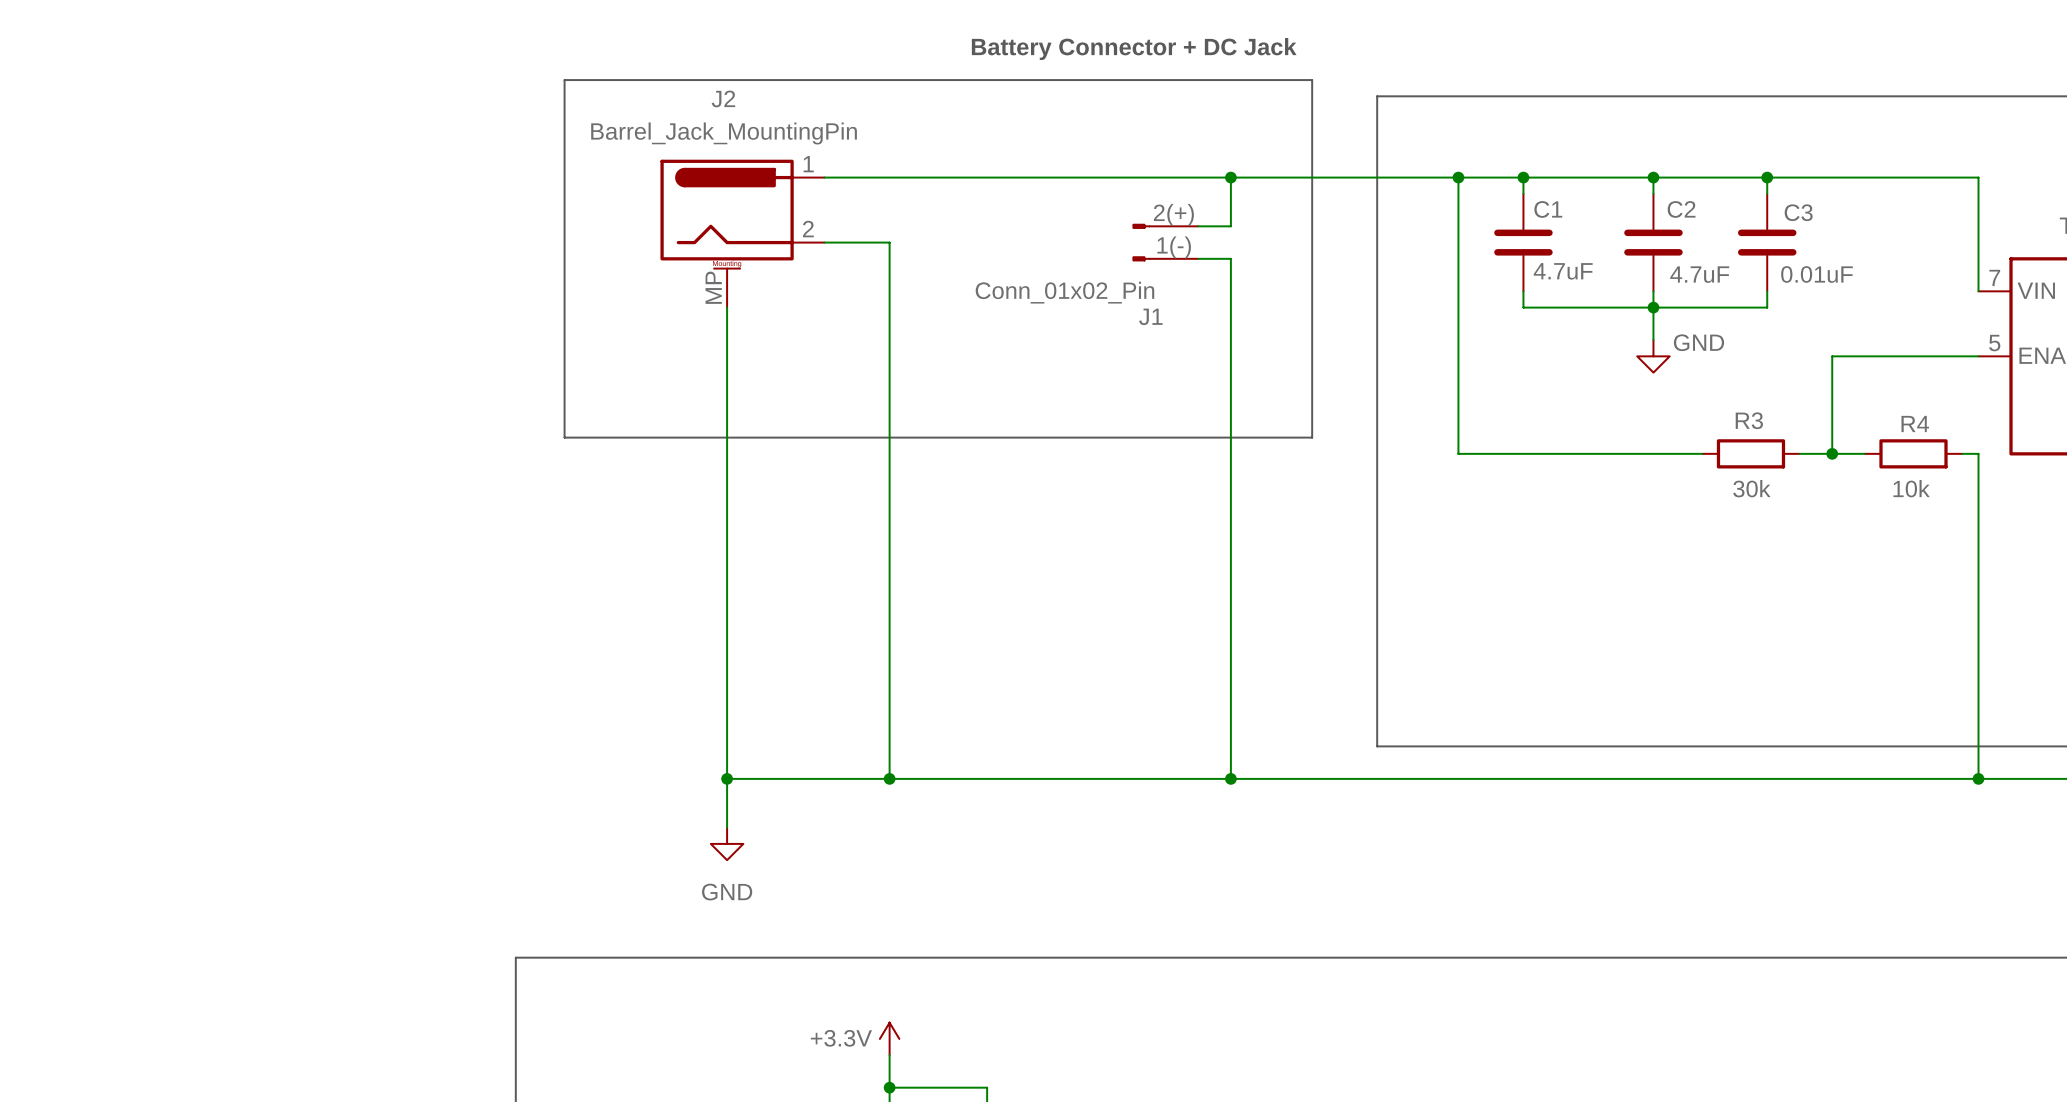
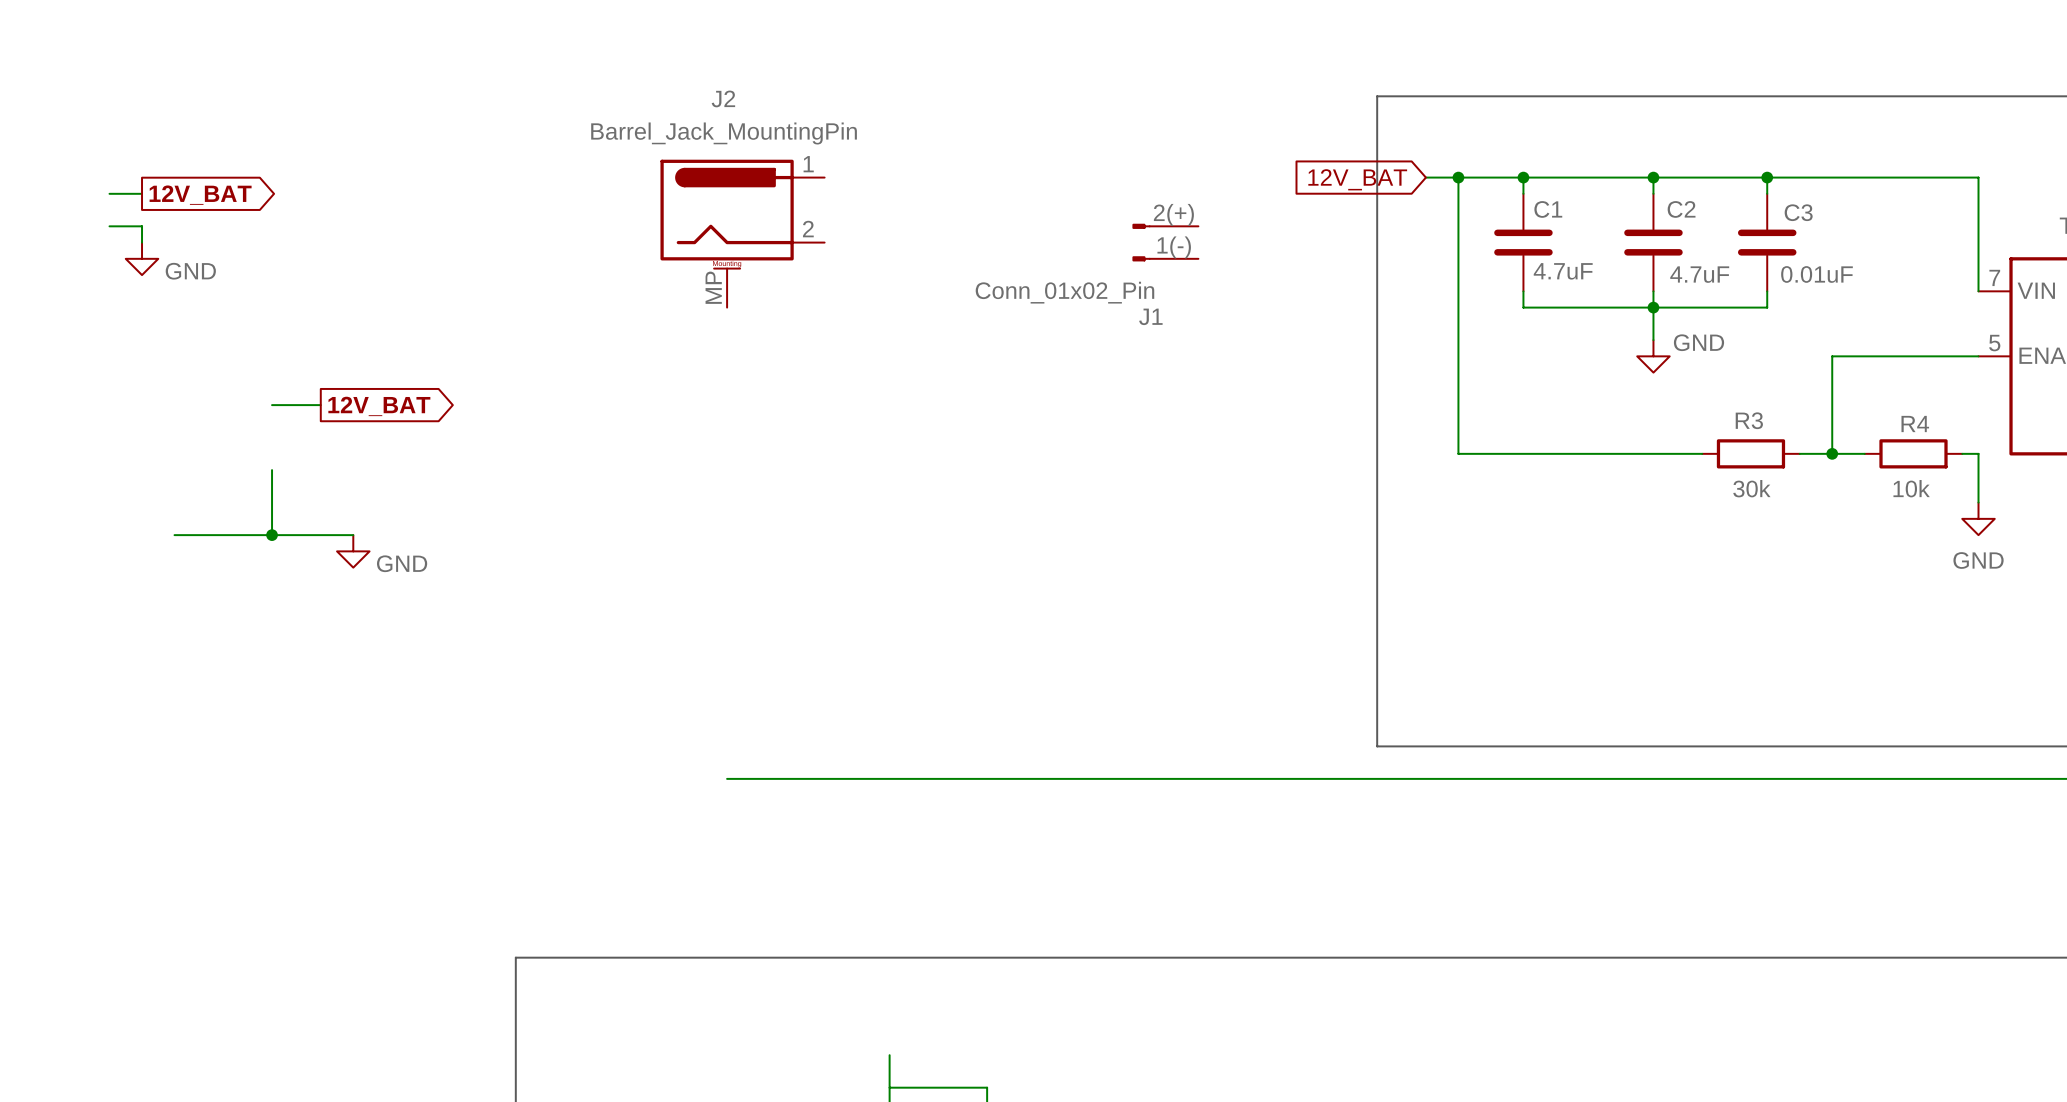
text: Battery Connector + DC Jack (1134, 49) -> none
line: (564, 80) (1312, 80) (1312, 437) (564, 437) (564, 80) -> none
wire: (824, 177) (1425, 177) -> none
wire: (1230, 177) (1230, 226) (1198, 226) -> none
junction: (1230, 177) -> none
global label: none -> 12V_BAT (1357, 179)
wire: none -> (109, 193) (142, 193)
global label: none -> 12V_BAT (200, 195)
wire: none -> (109, 226) (142, 226) (142, 242)
wire: (824, 242) (889, 242) (889, 778) -> none
power symbol: none -> GND (142, 258)
wire: (1198, 258) (1230, 258) (1230, 778) -> none
wire: (727, 307) (727, 827) -> none
wire: none -> (272, 405) (320, 405)
global label: none -> 12V_BAT (379, 406)
wire: none -> (272, 470) (272, 535)
wire: (1978, 502) (1978, 778) -> none
power symbol: none -> GND (1978, 518)
wire: none -> (174, 535) (353, 535)
junction: none -> (272, 535)
power symbol: none -> GND (353, 551)
junction: (727, 778) -> none
junction: (889, 778) -> none
junction: (1230, 778) -> none
junction: (1978, 778) -> none
power symbol: GND (727, 843) -> none
power symbol: +3.3V (889, 1038) -> none
junction: (889, 1087) -> none

